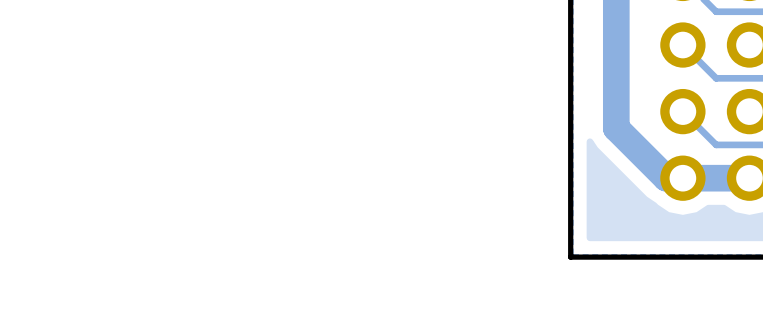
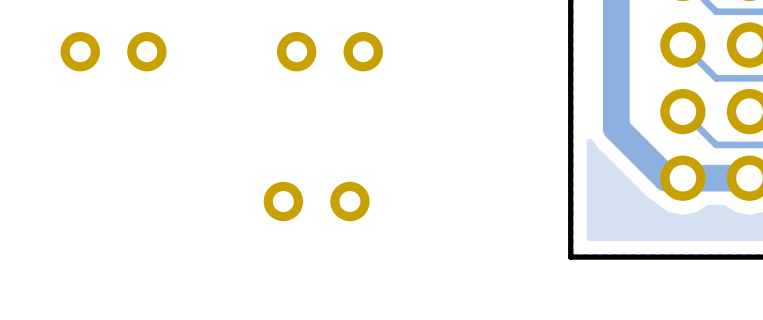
part: none -> (113, 51)
part: none -> (329, 51)
part: none -> (316, 201)

